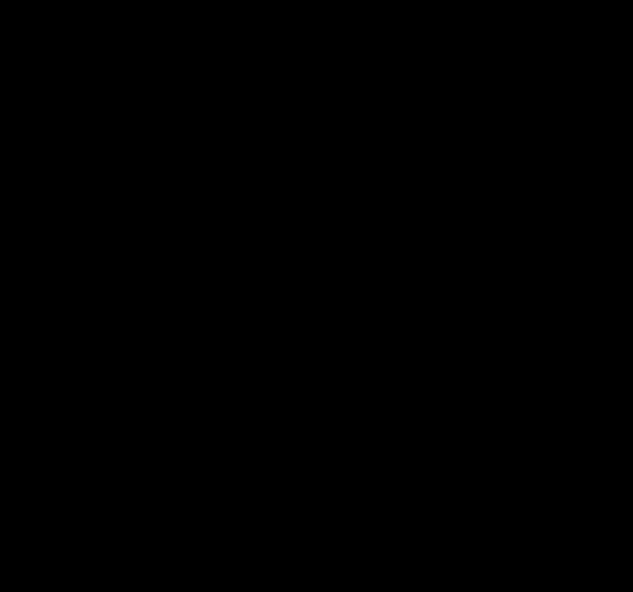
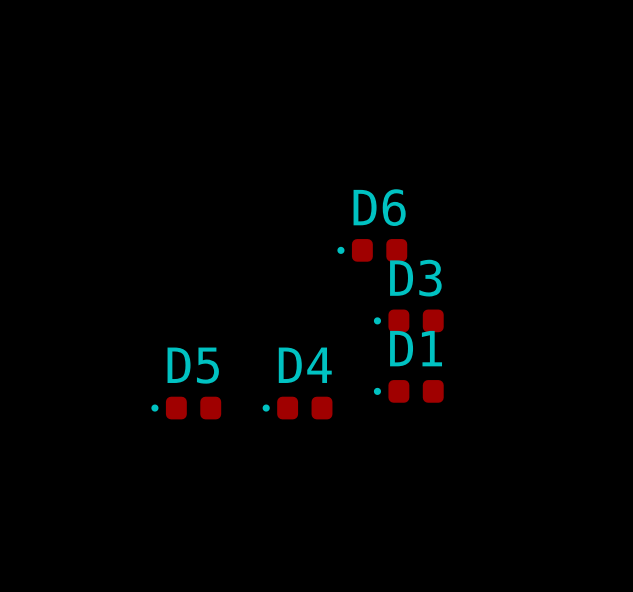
D6: none -> (372, 250)
D3: none -> (408, 320)
D1: none -> (408, 391)
D5: none -> (186, 408)
D4: none -> (297, 408)

